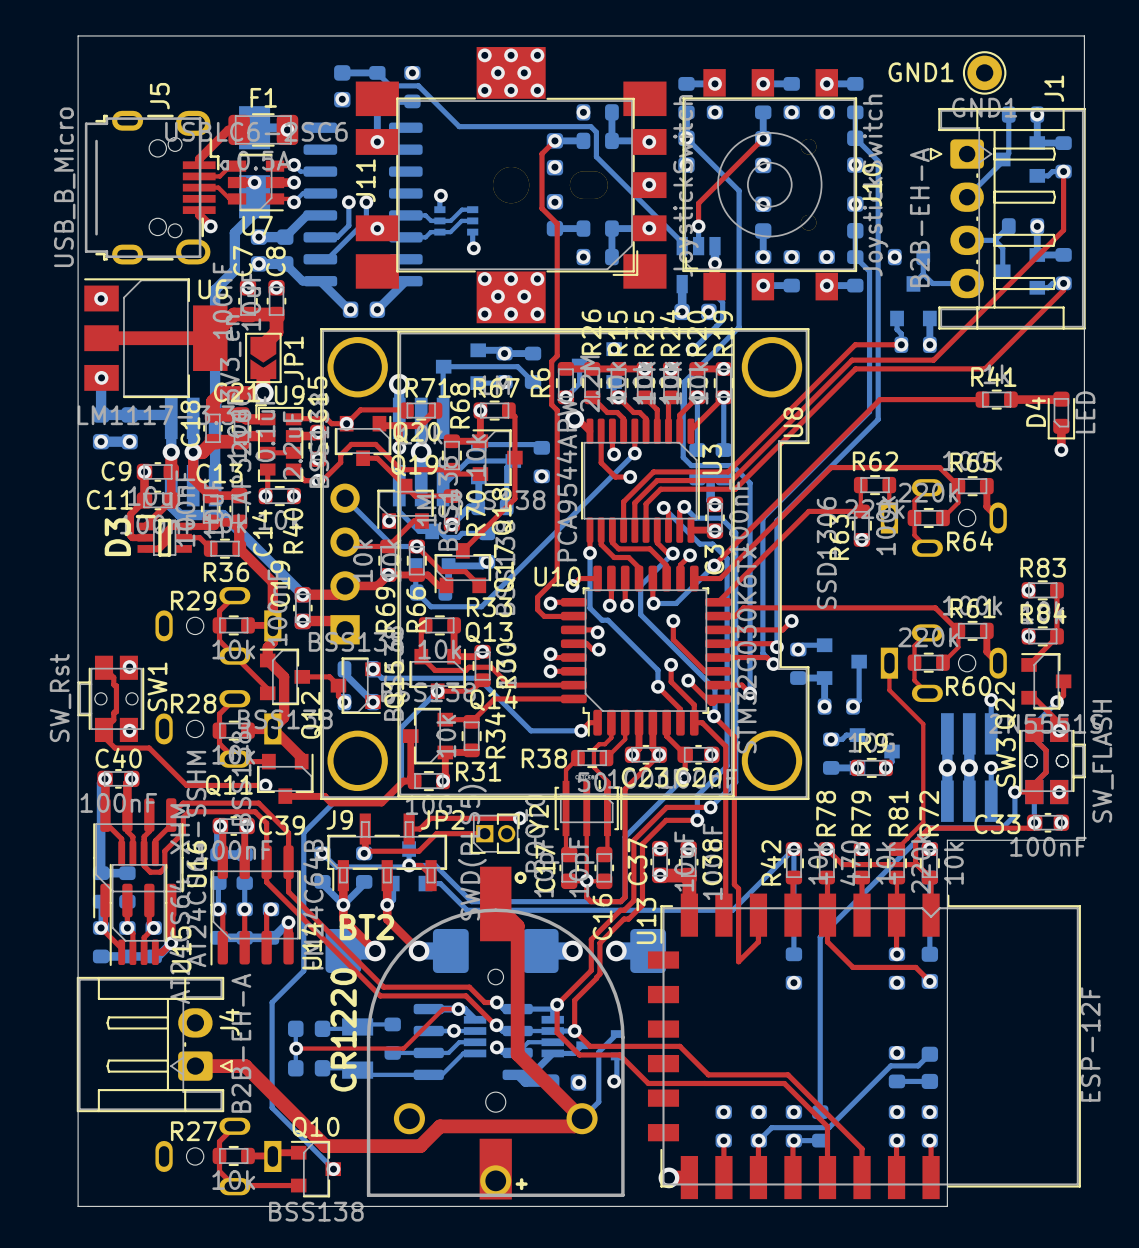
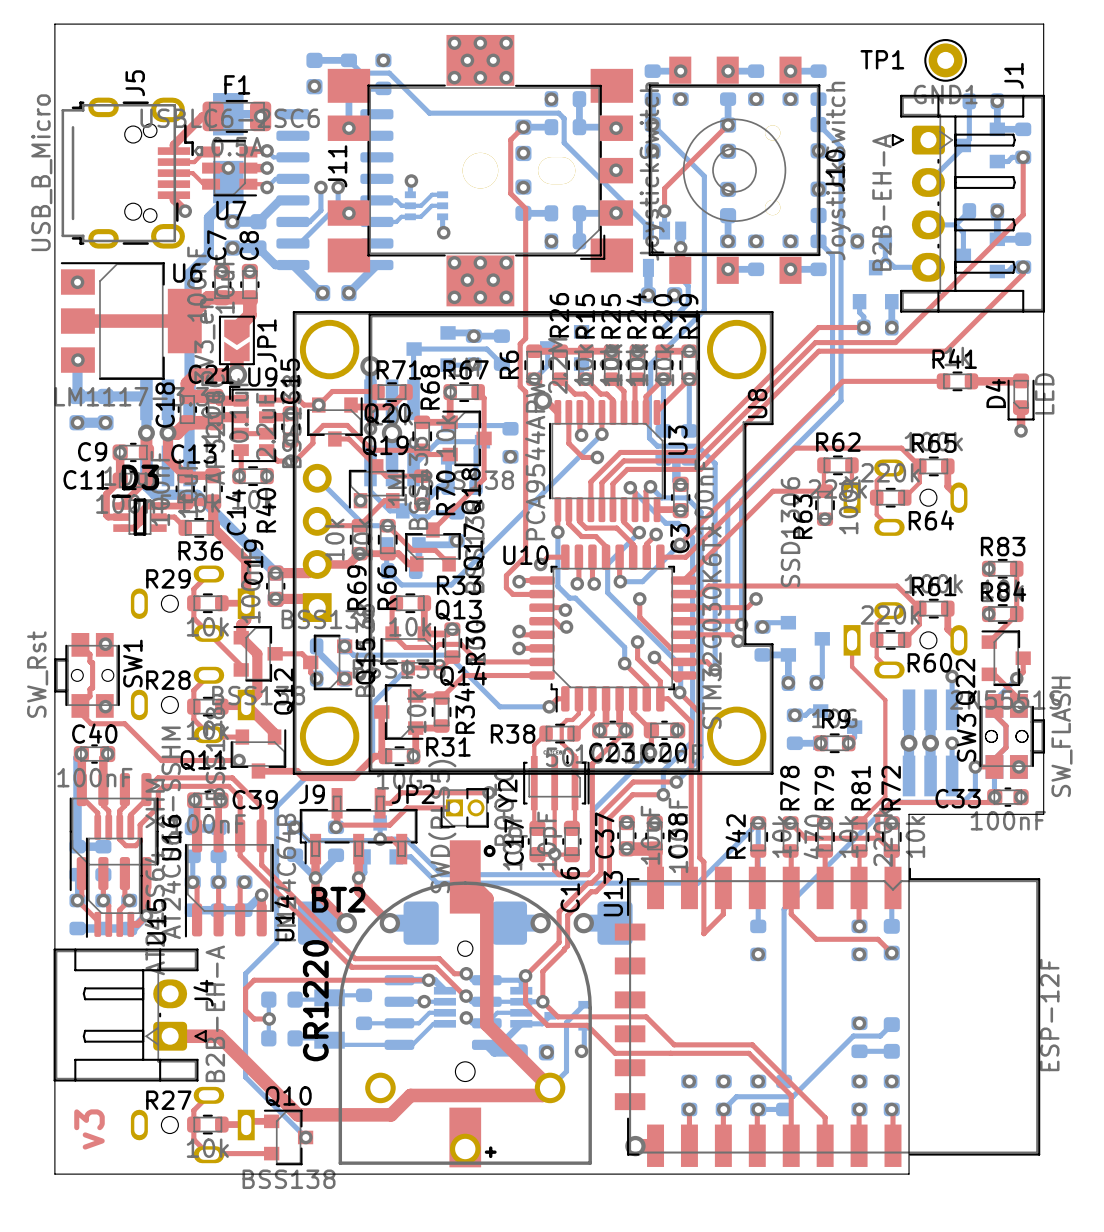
GND1 name: GND1 (921, 72) -> TP1 (882, 59)
D3 name rotation: 0° (117, 537) -> 90° clockwise (140, 477)
D3 name position: D3 (117, 537) -> D3 (140, 477)
top track: (443, 1009) (403, 1048) (296, 1048) -> (413, 980) (254, 980) (245, 988) (245, 1010) (254, 1019) (269, 1019)
text: none -> v3 (89, 1129)

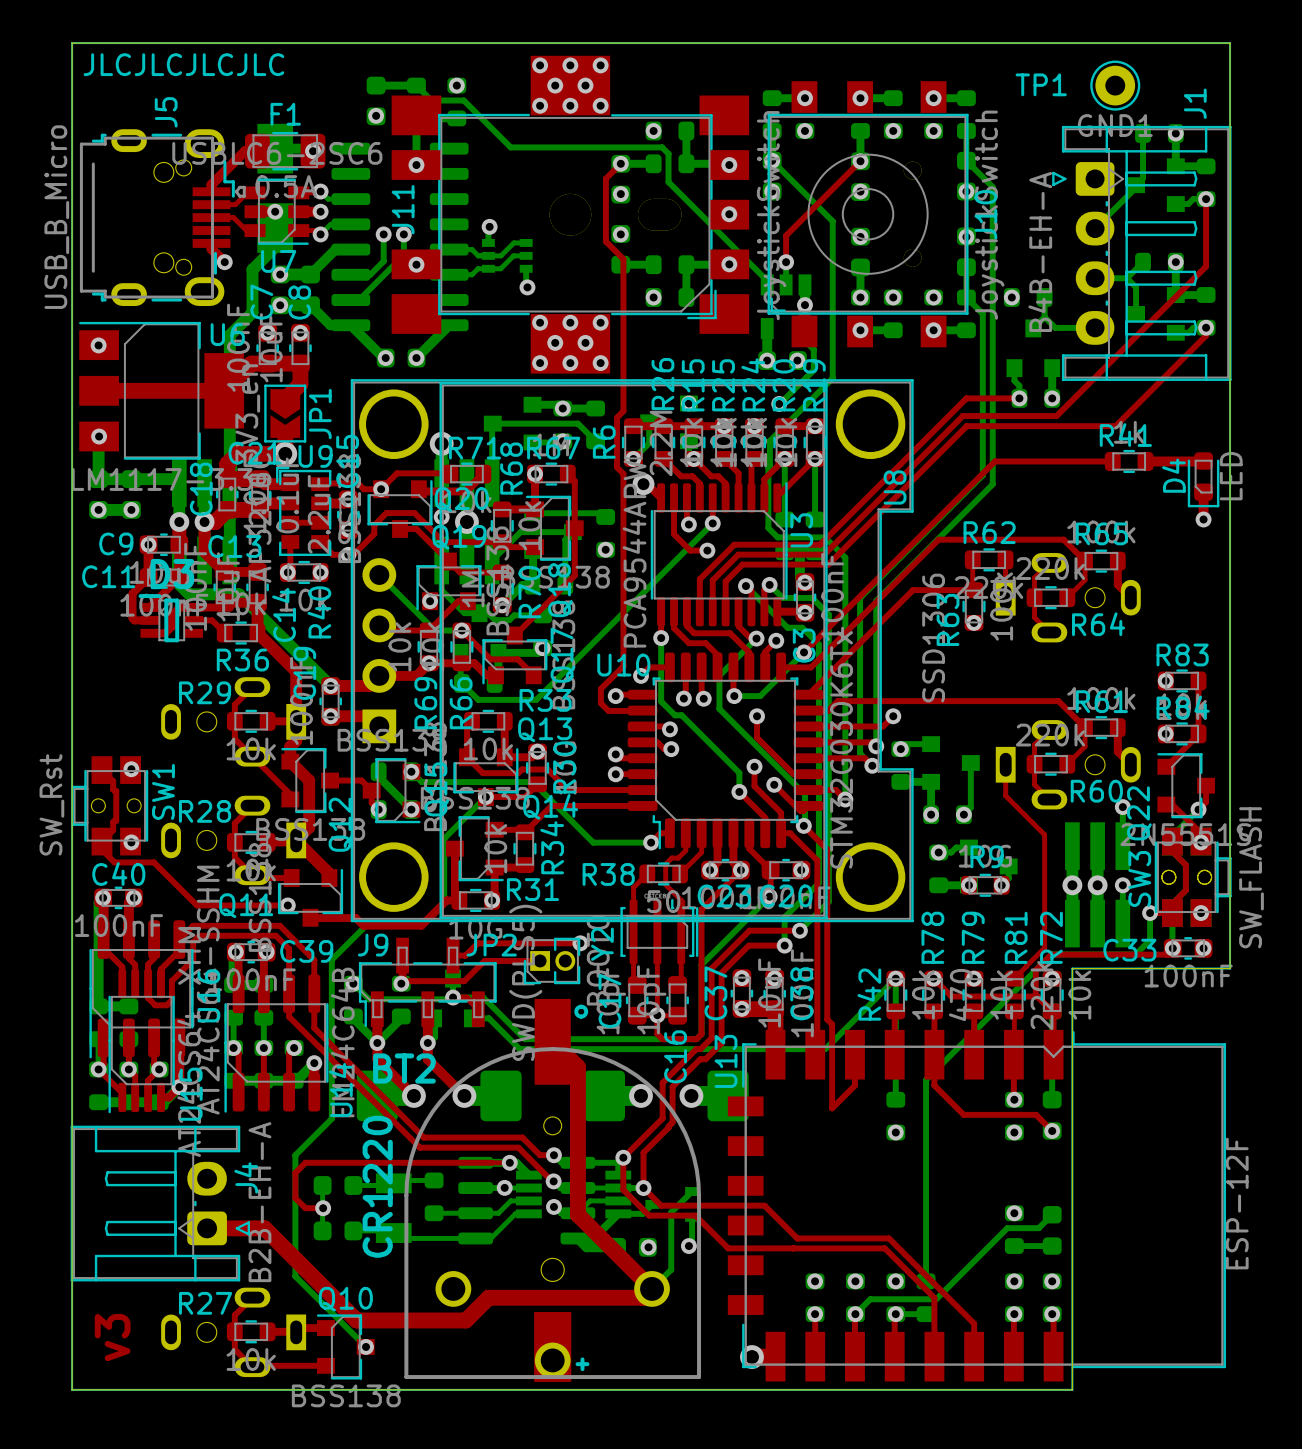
line: none -> (72, 43) (72, 1389) (1072, 1389) (1072, 968) (1230, 968) (1230, 43) (72, 43)
text: none -> JLCJLCJLCJLC (183, 64)
J1 value: B2B-EH-A (881, 202) -> B4B-EH-A (1040, 252)

